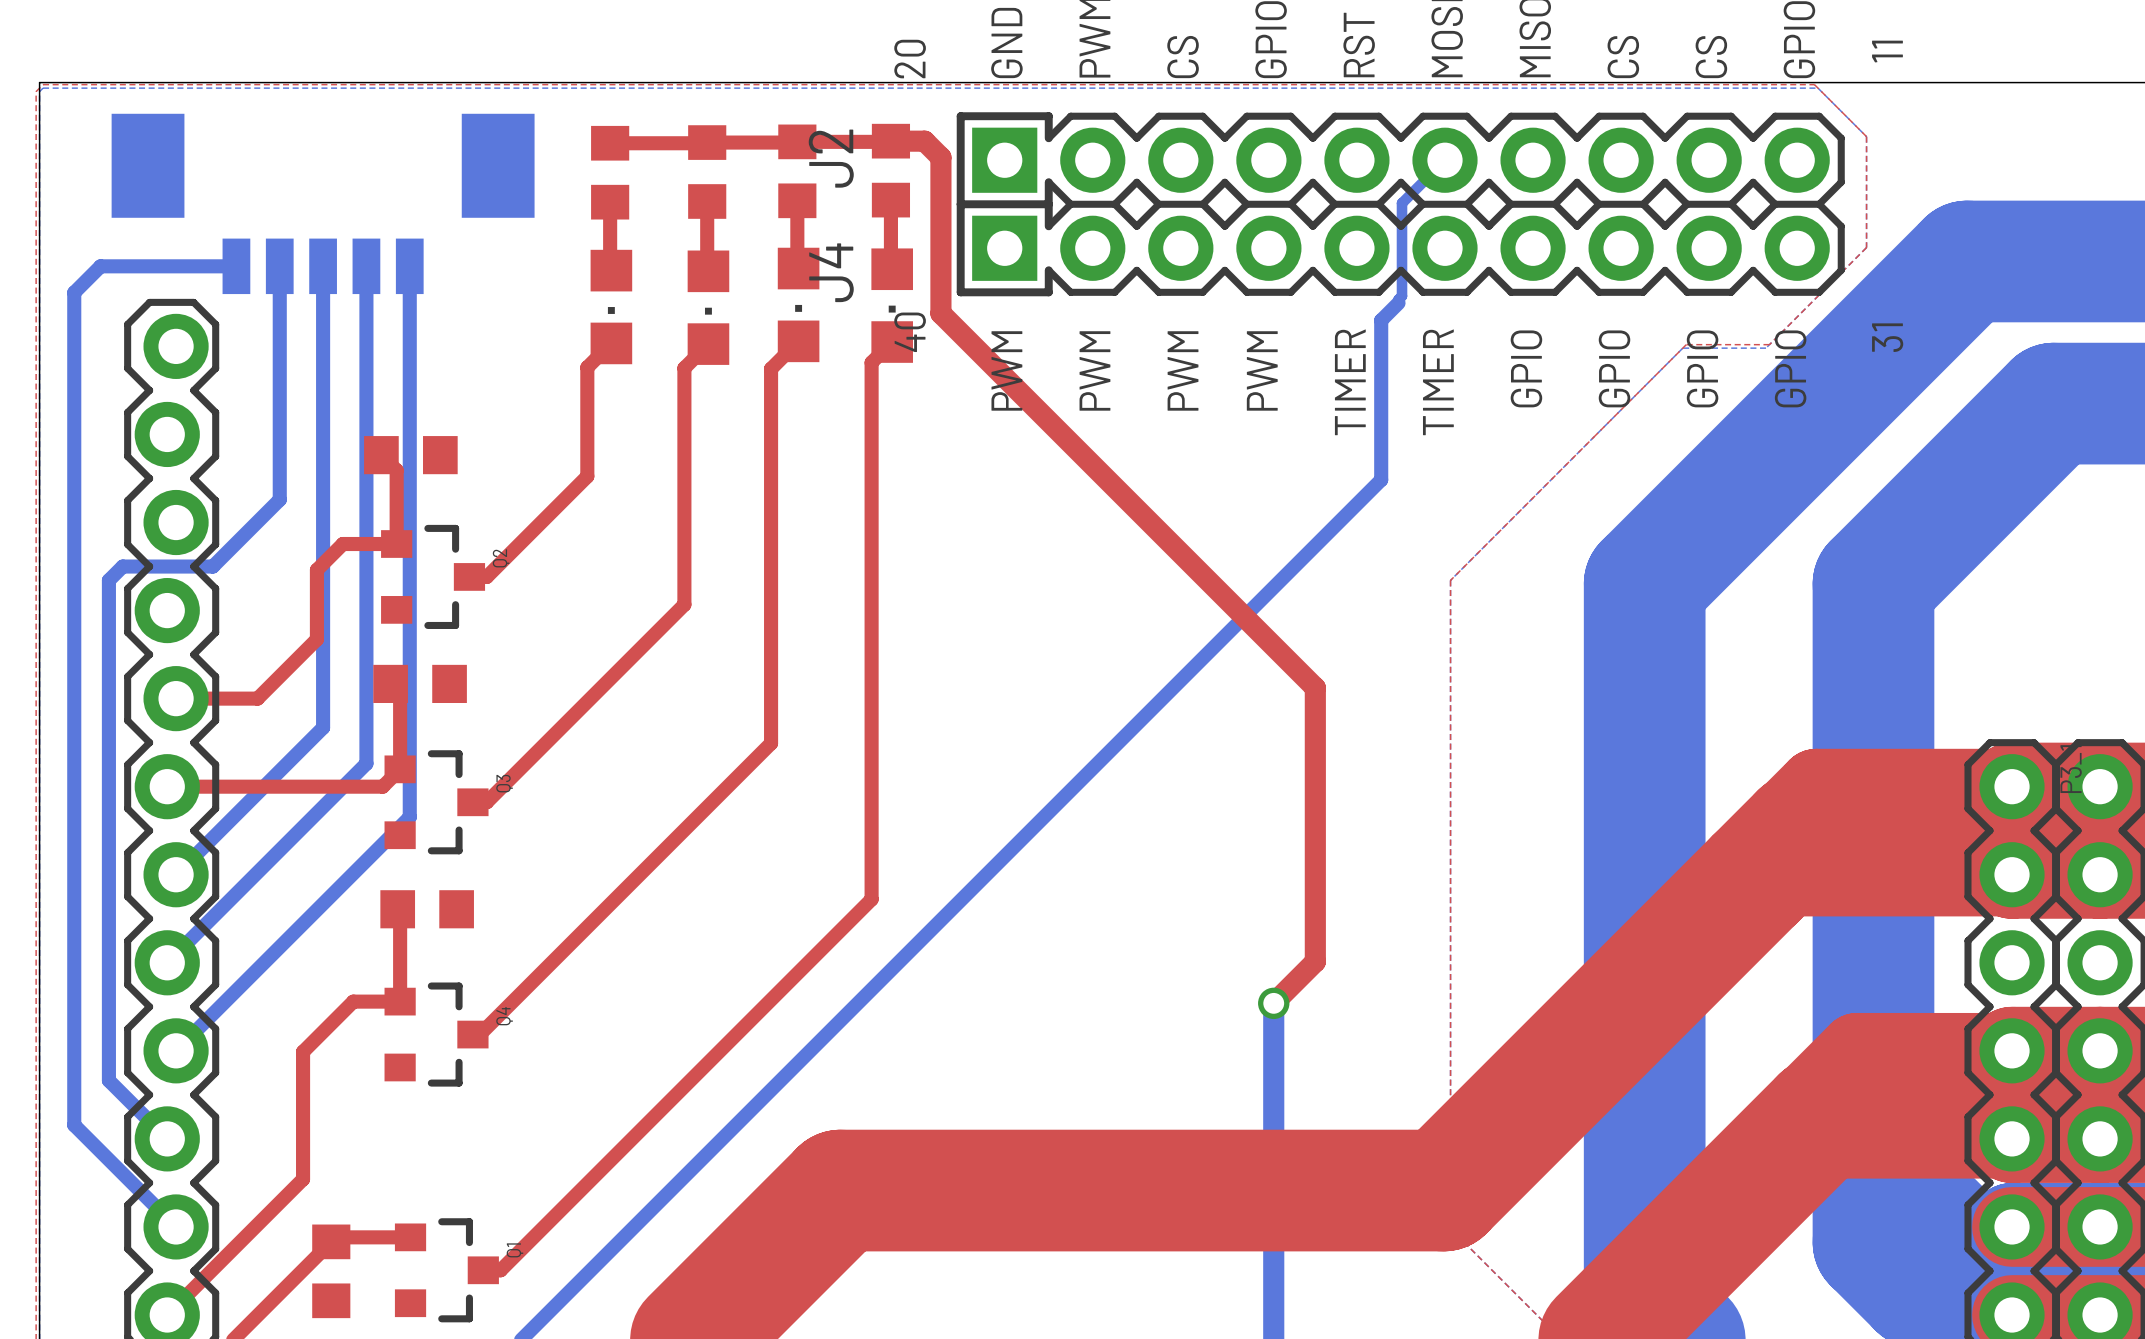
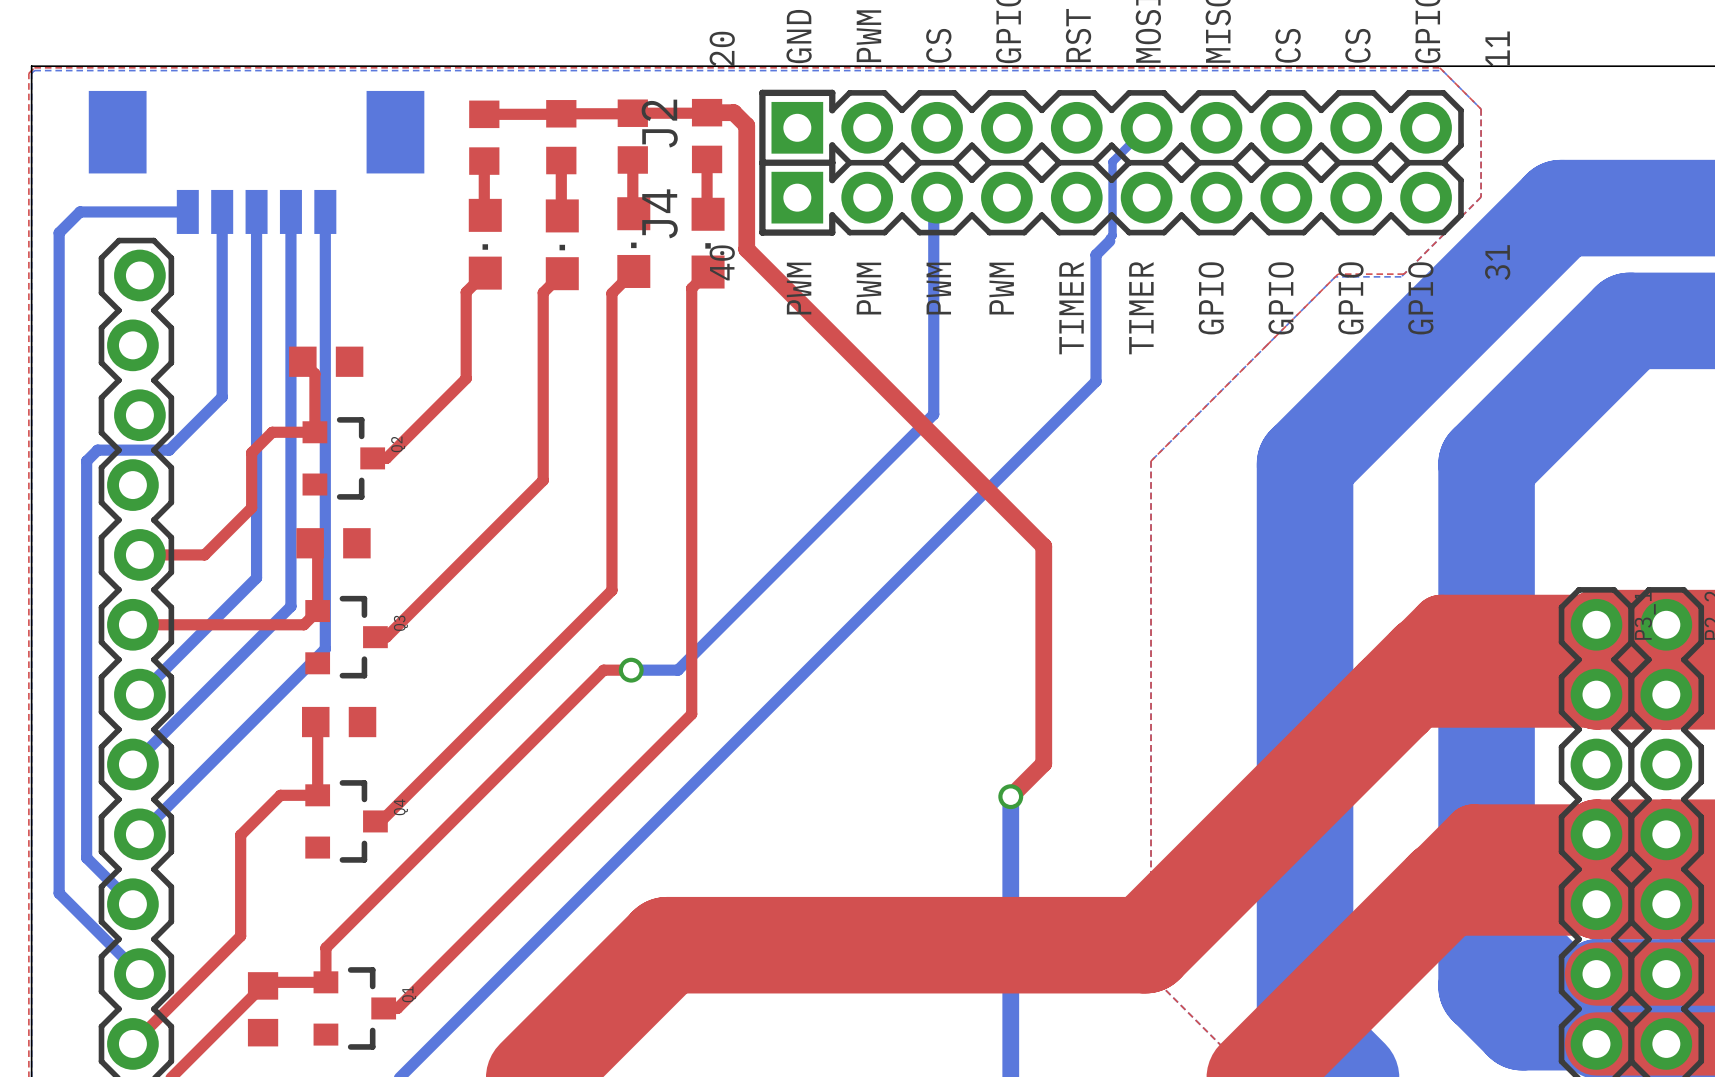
bottom track: none -> (937, 197) (933, 200) (933, 414) (677, 670) (631, 670)
top track: none -> (631, 670) (603, 670) (325, 947) (325, 982)
via: none -> (631, 670)

